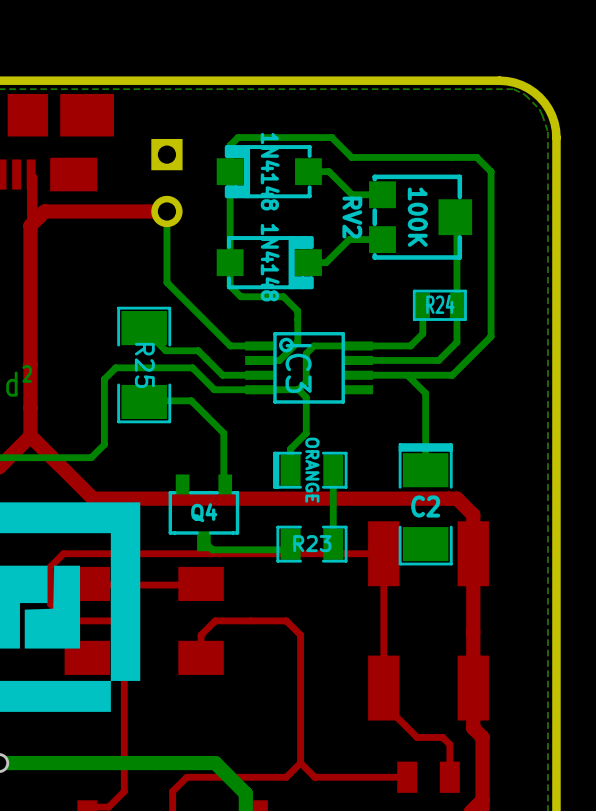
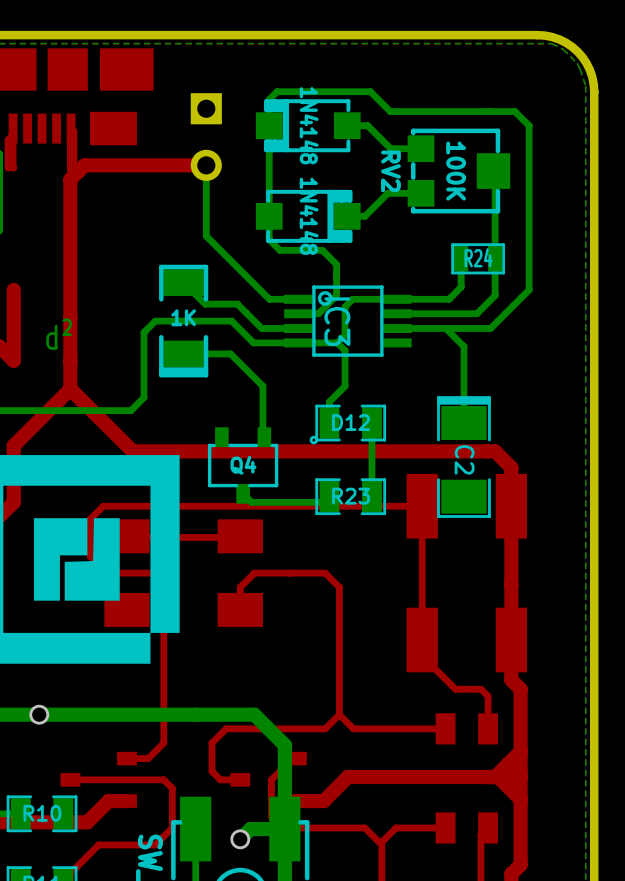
R25: (144, 365) -> none
part: none -> 1K (183, 321)
part: ORANGE (310, 470) -> none
D12: none -> (347, 424)
C2 name rotation: 0° (425, 506) -> 90° clockwise (464, 459)

